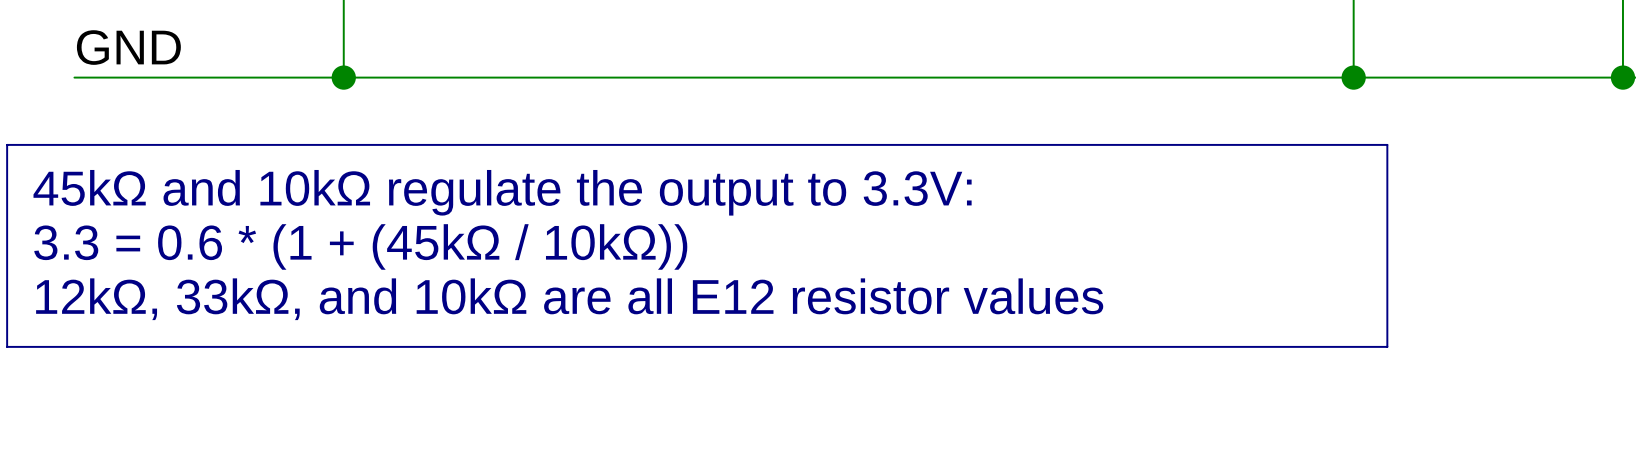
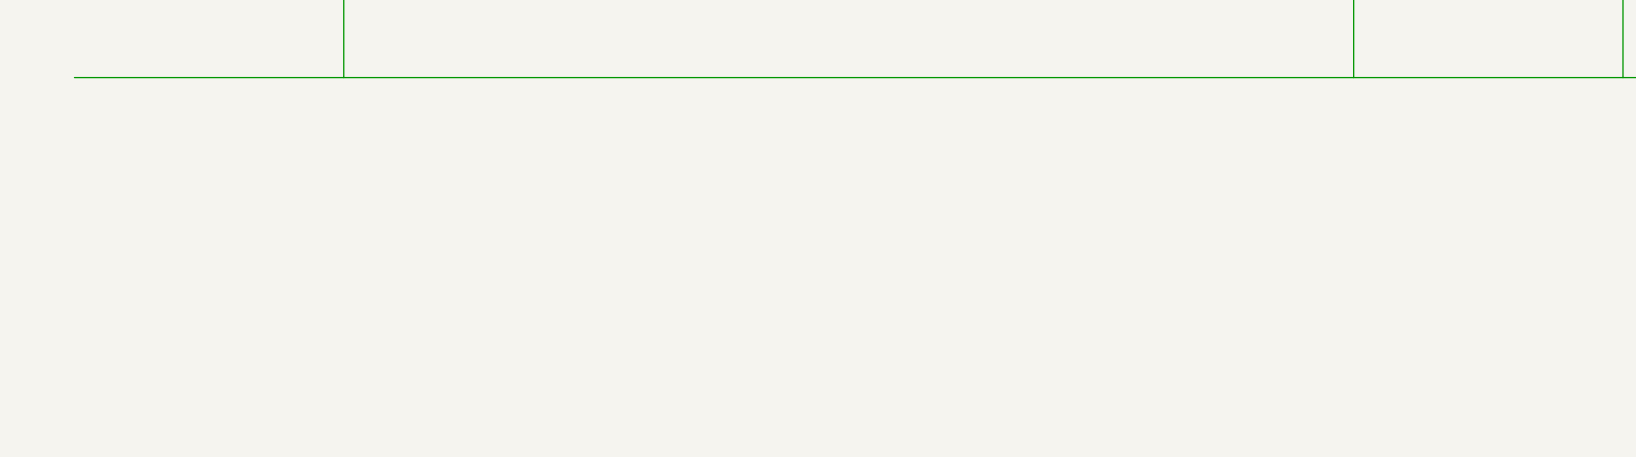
label: GND (128, 47) -> none
junction: (343, 77) -> none
junction: (1353, 77) -> none
junction: (1622, 77) -> none
line: (7, 144) (1387, 144) (1387, 346) (7, 346) (7, 144) -> none
text: 45kΩ and 10kΩ regulate the output to 3.3V: (502, 192) -> none
text: 3.3 = 0.6 * (1 + (45kΩ / 10kΩ)) (360, 246) -> none
text: 12kΩ, 33kΩ, and 10kΩ are all E12 resistor values (569, 299) -> none

